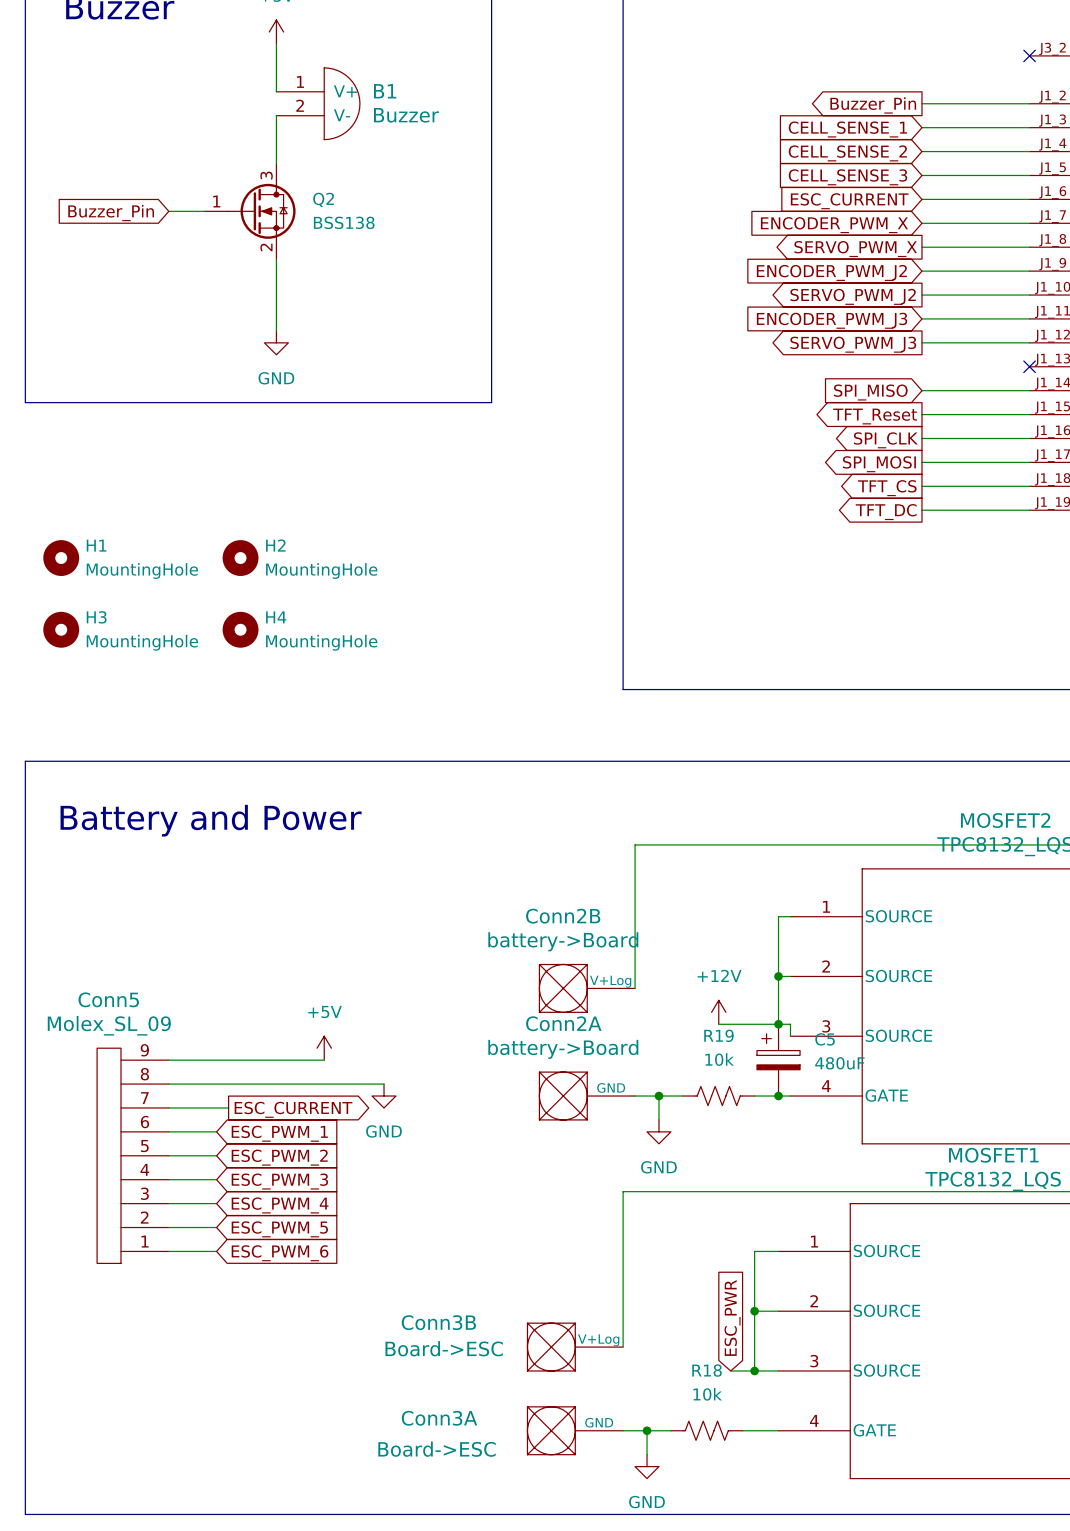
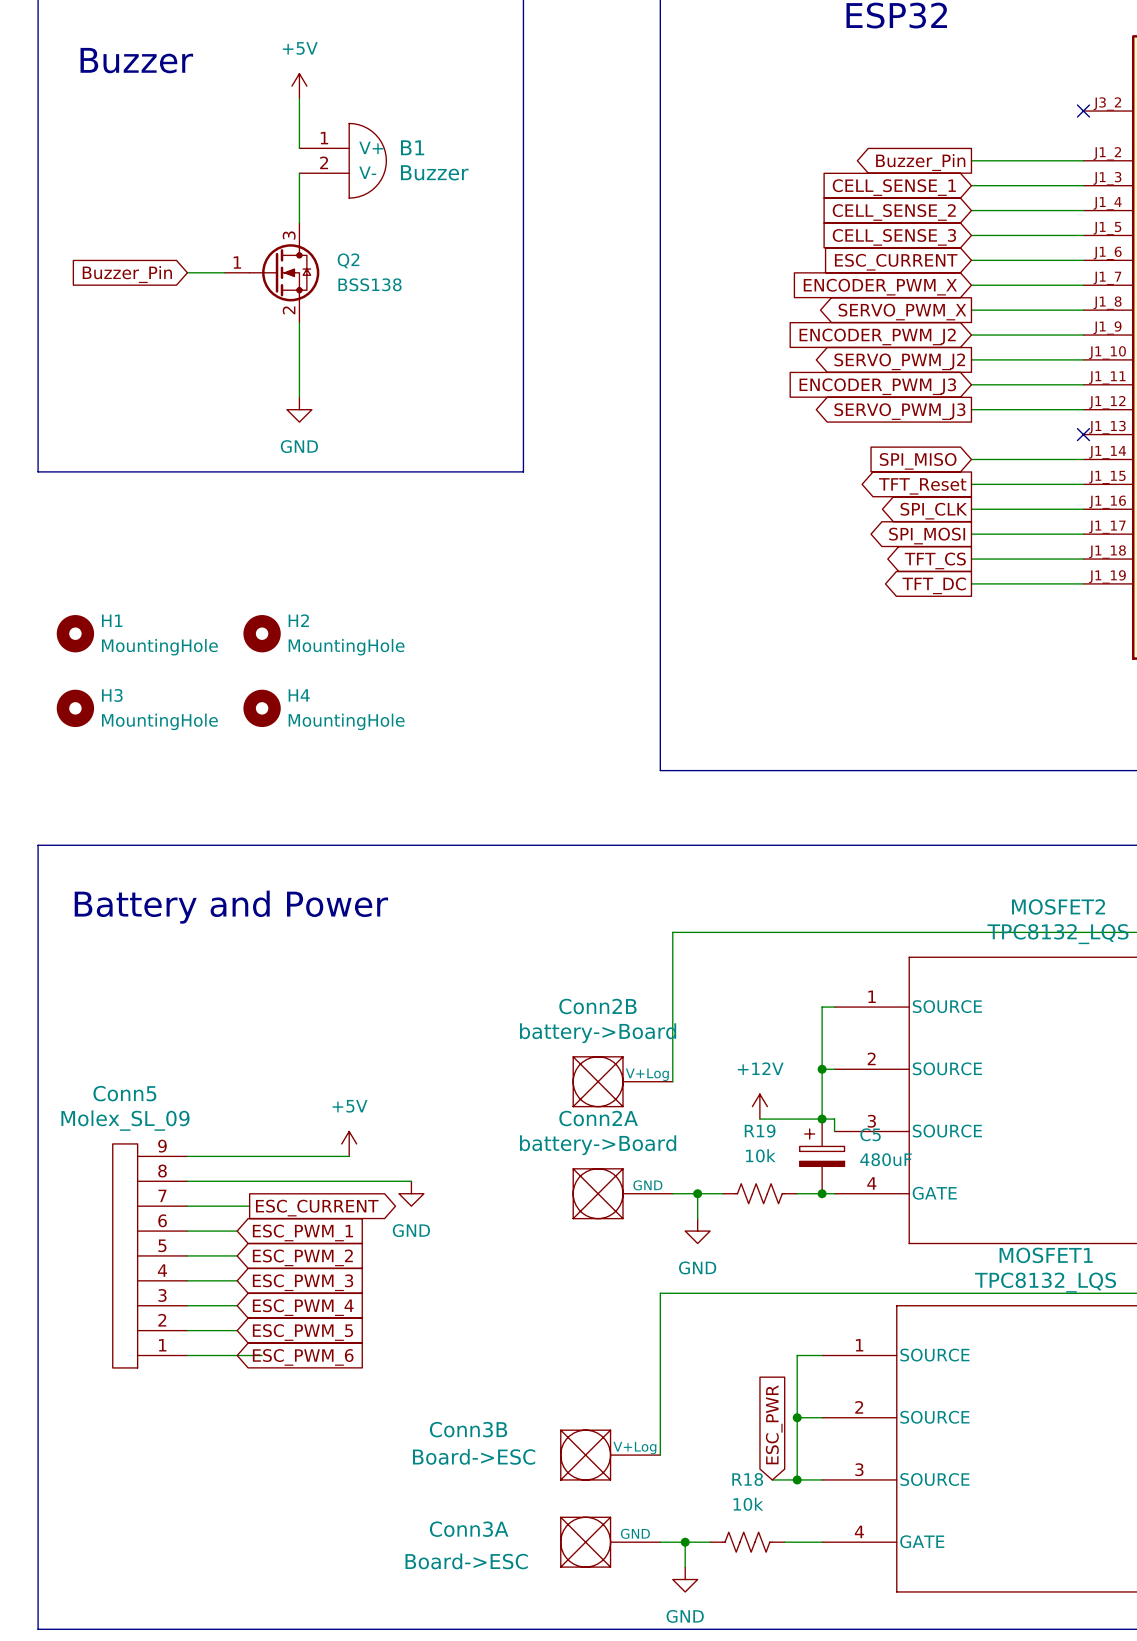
wire: none -> (237, 1355) (262, 1355)

